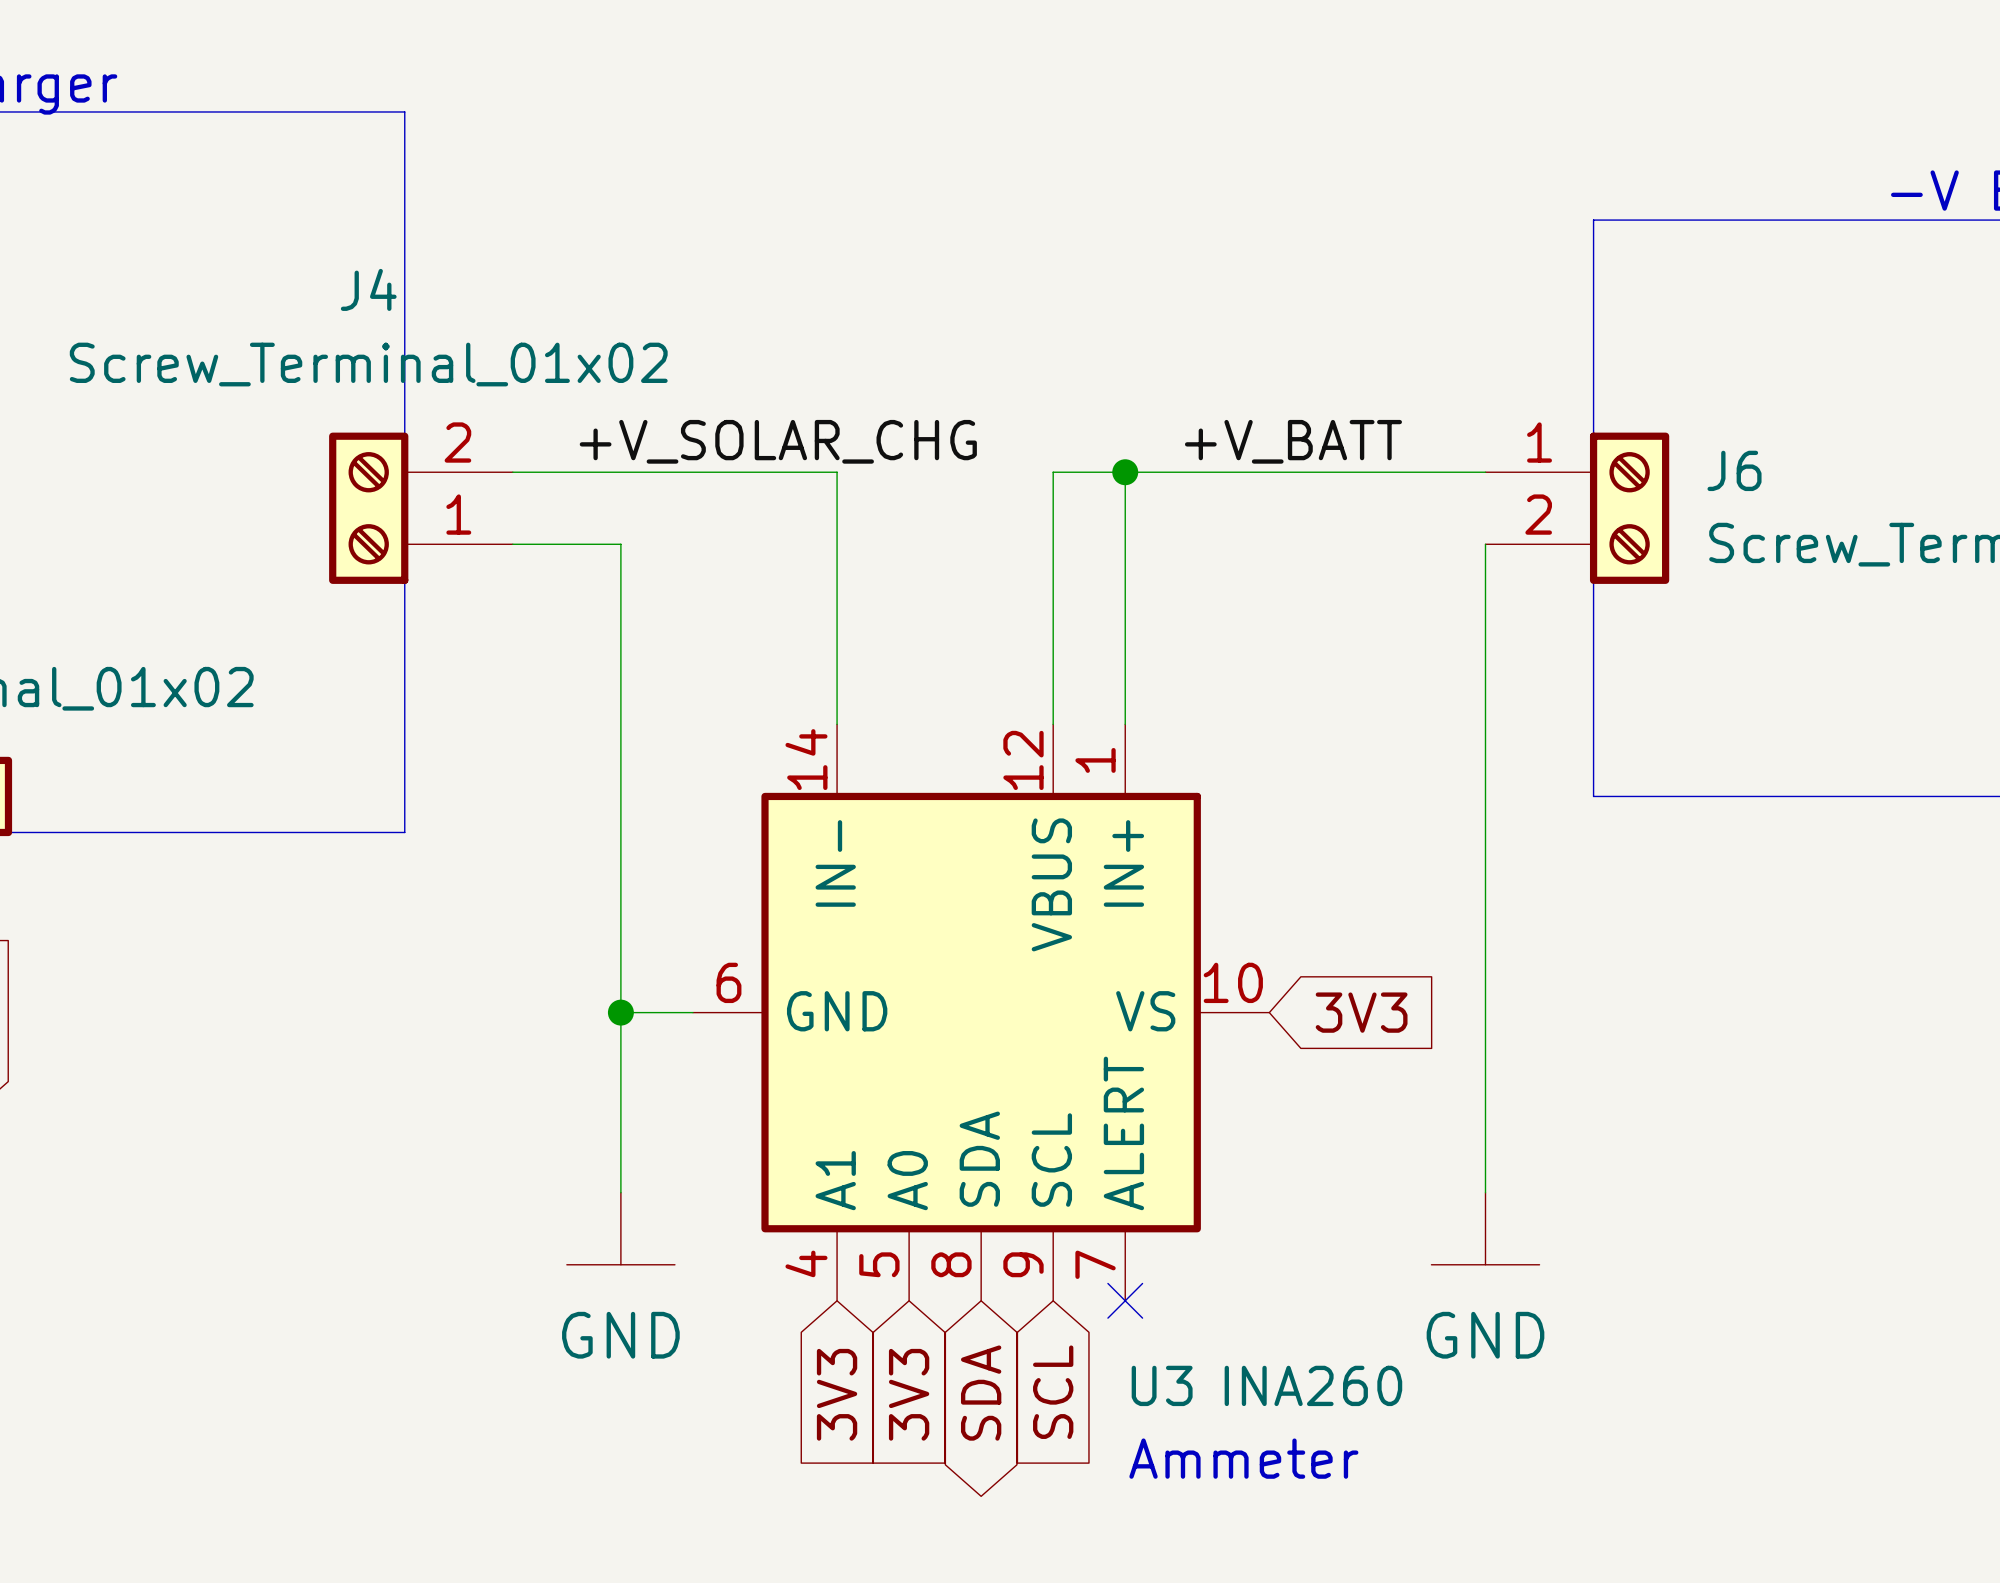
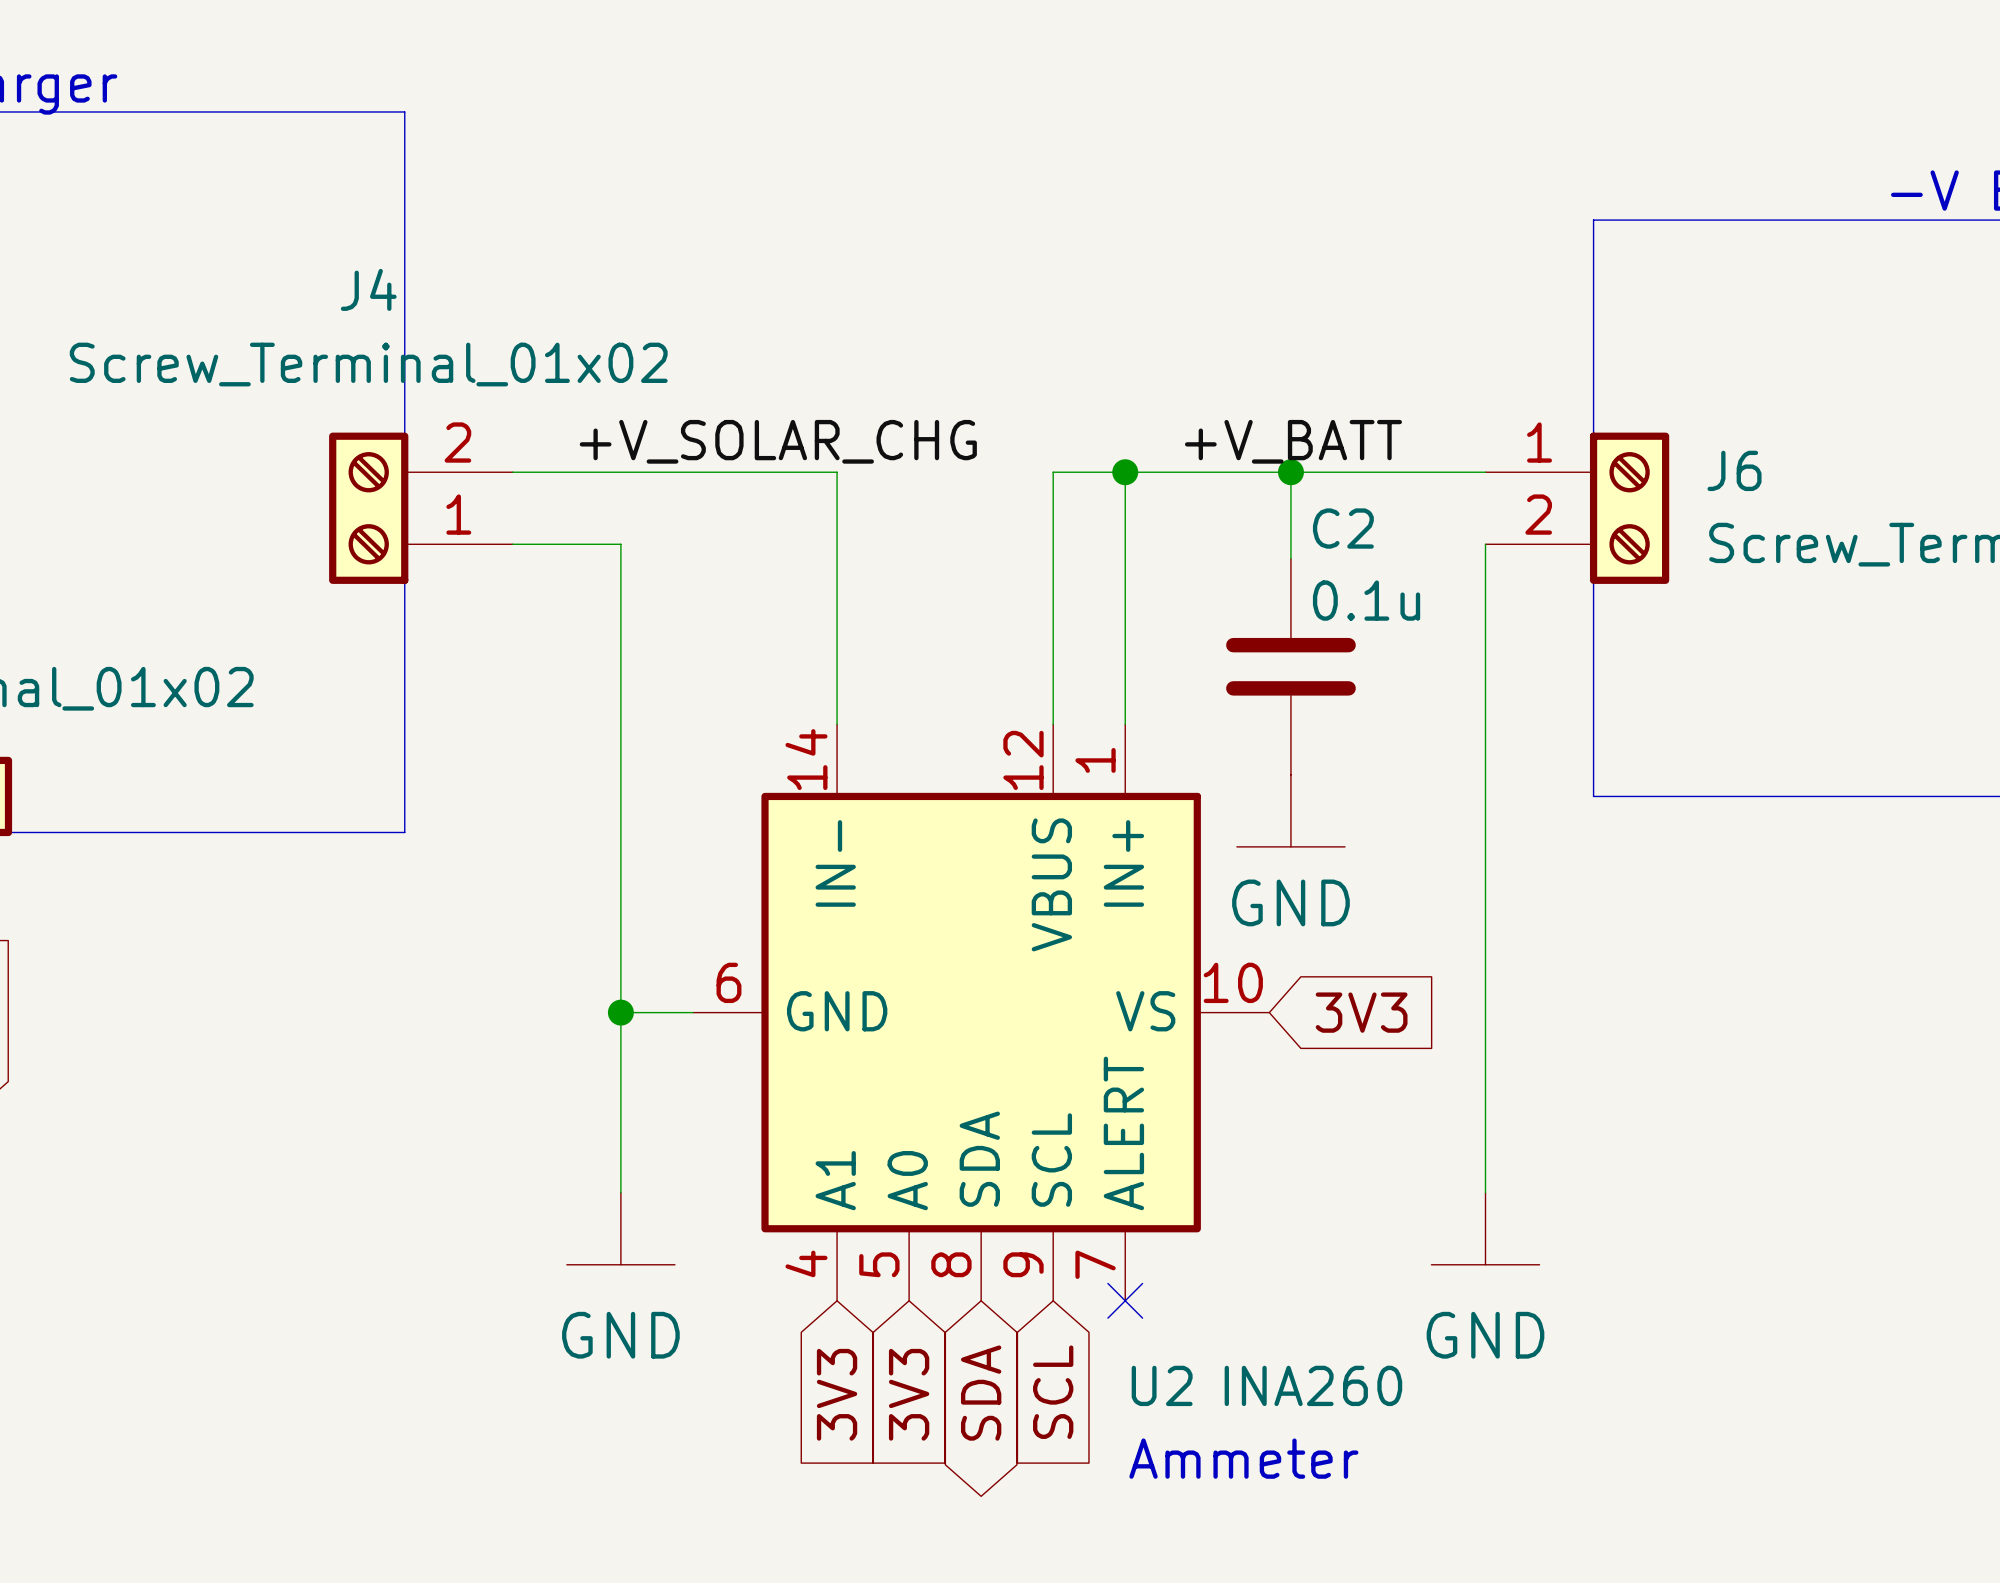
wire: none -> (1290, 472) (1290, 558)
junction: none -> (1290, 472)
C2: none -> 0.1u (1290, 666)
power symbol: none -> GND (1290, 810)
U3 name: U3 (1162, 1385) -> U2 (1162, 1385)

